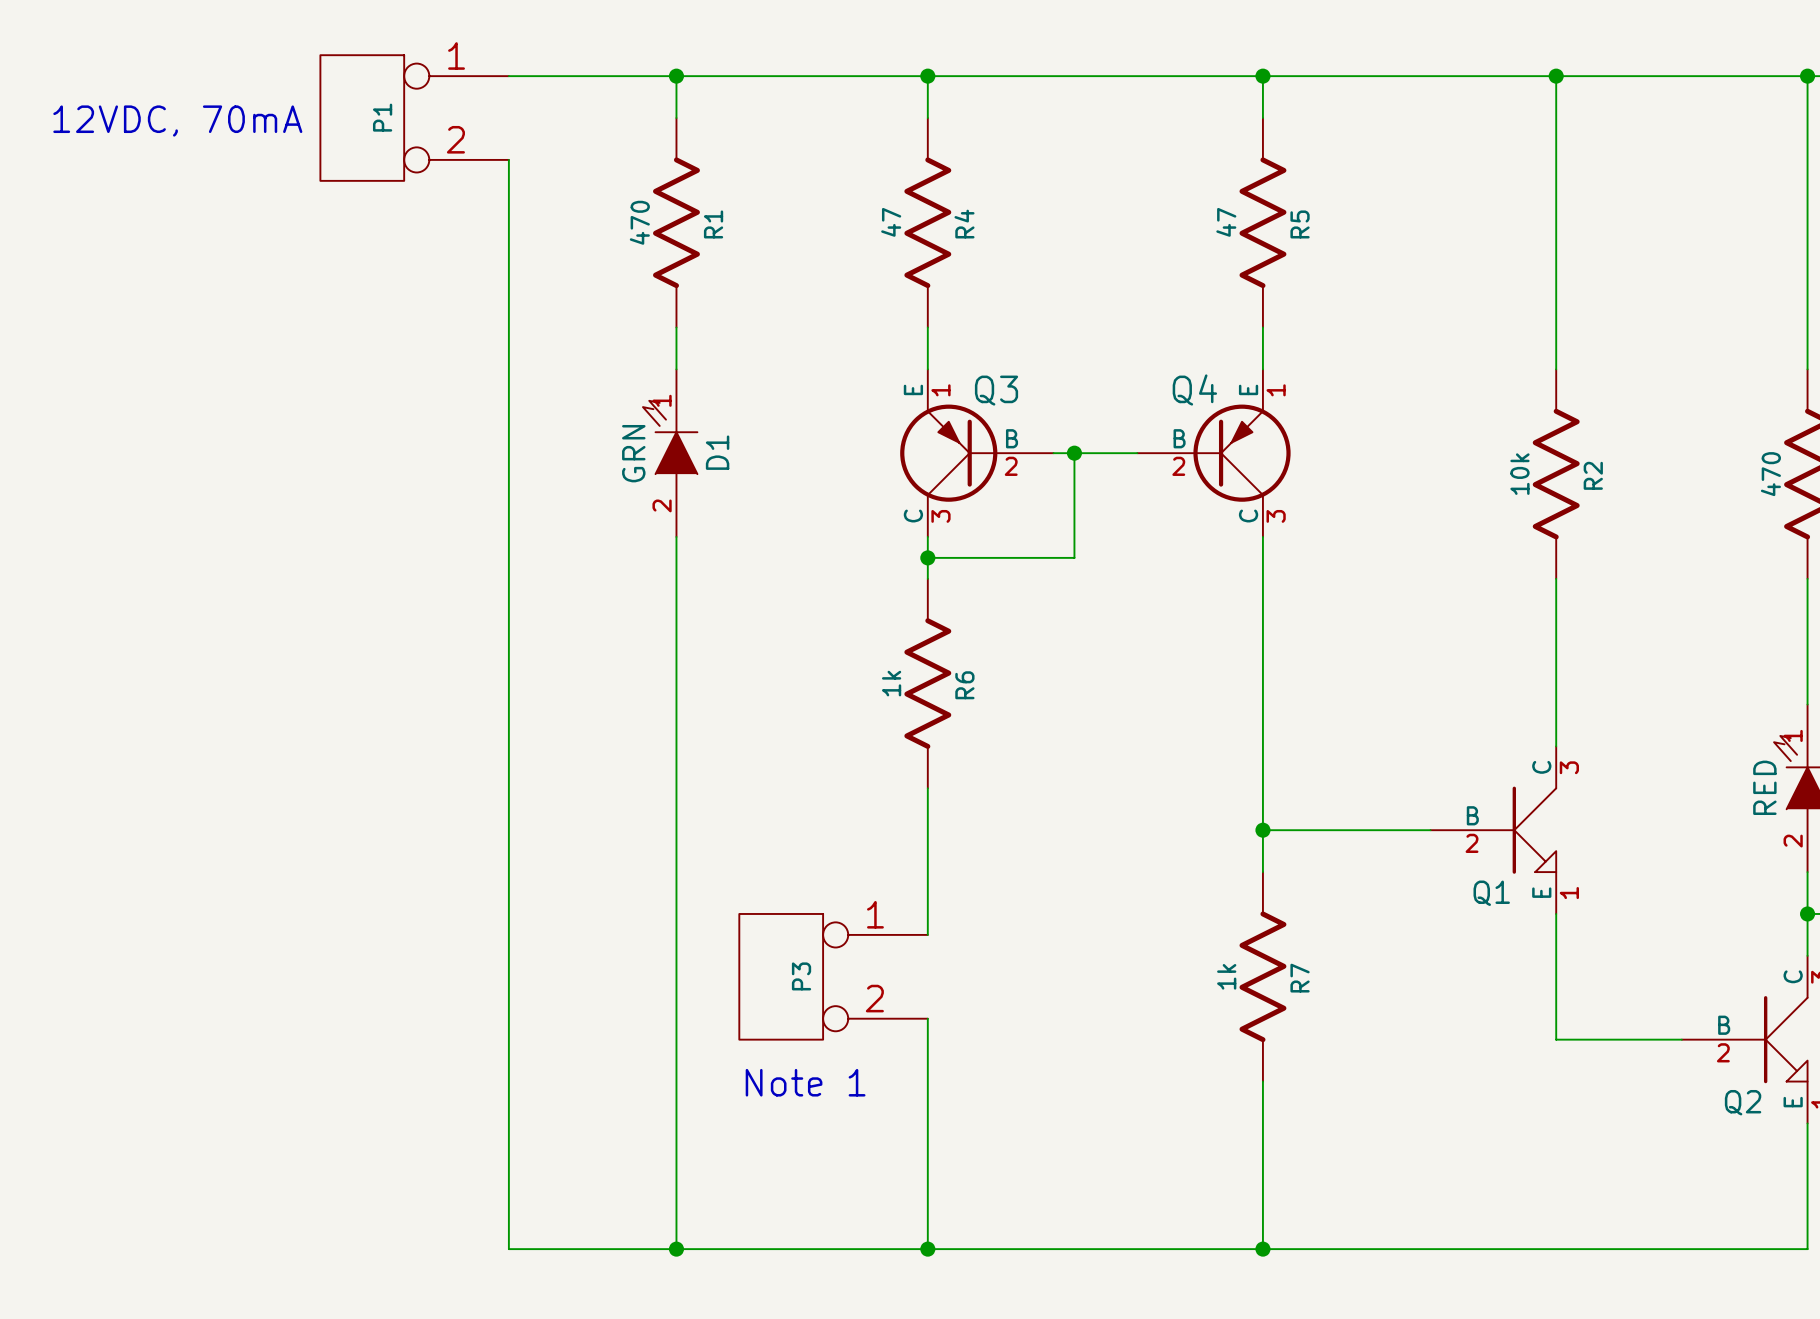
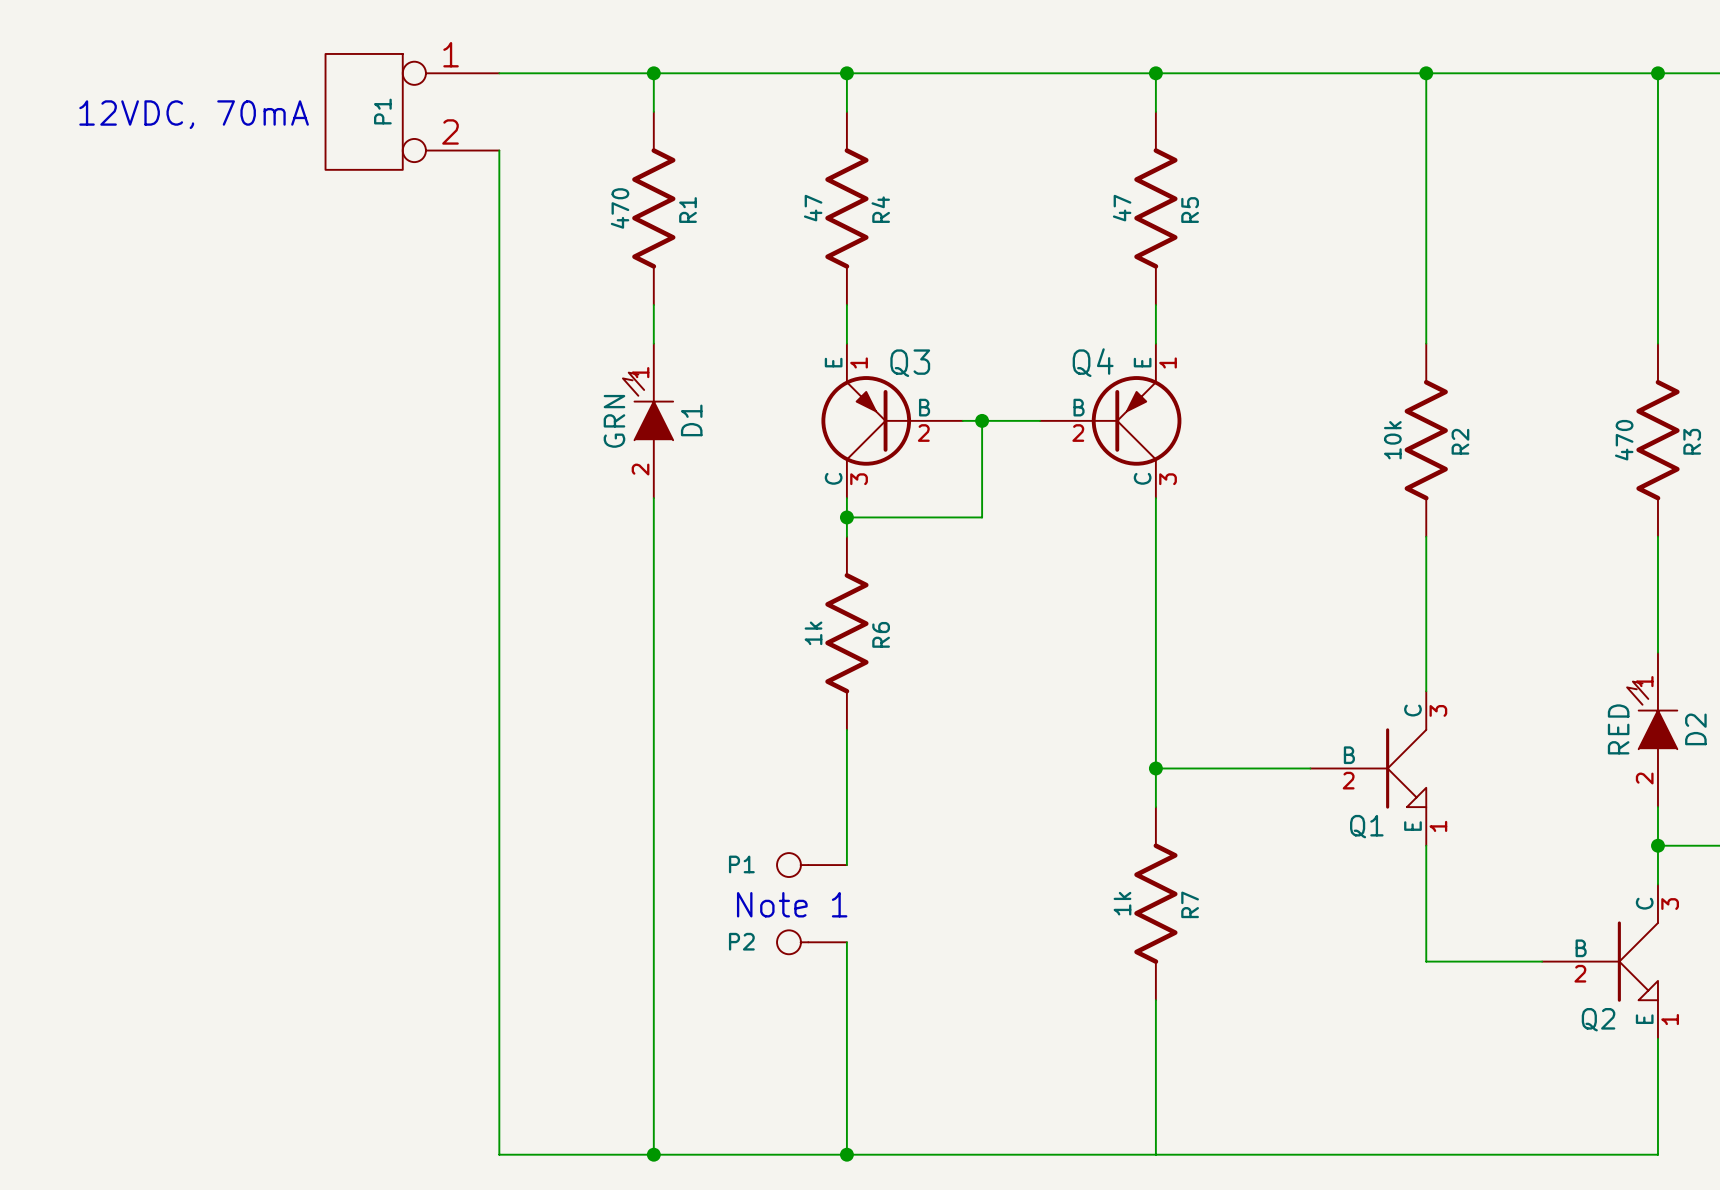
wire: (676, 76) (676, 118) -> (653, 73) (653, 111)
junction position: (676, 76) -> (653, 73)
P1 position: (414, 118) -> (412, 111)
text position: 12VDC, 70mA (177, 121) -> 12VDC, 70mA (194, 114)
wire: (508, 159) (508, 1249) (550, 1249) -> (499, 150) (499, 1154)
R1 position: (676, 222) -> (653, 208)
wire: (676, 327) (676, 369) -> (653, 305) (653, 343)
D1 position: (670, 453) -> (648, 420)
wire: (676, 536) (676, 1249) -> (653, 498) (653, 1154)
P1: none -> (811, 865)
P3: (833, 976) -> none
P2: none -> (811, 942)
text position: Note 1 (805, 1082) -> Note 1 (792, 904)
junction position: (676, 1249) -> (653, 1154)
junction: (1262, 1249) -> none

